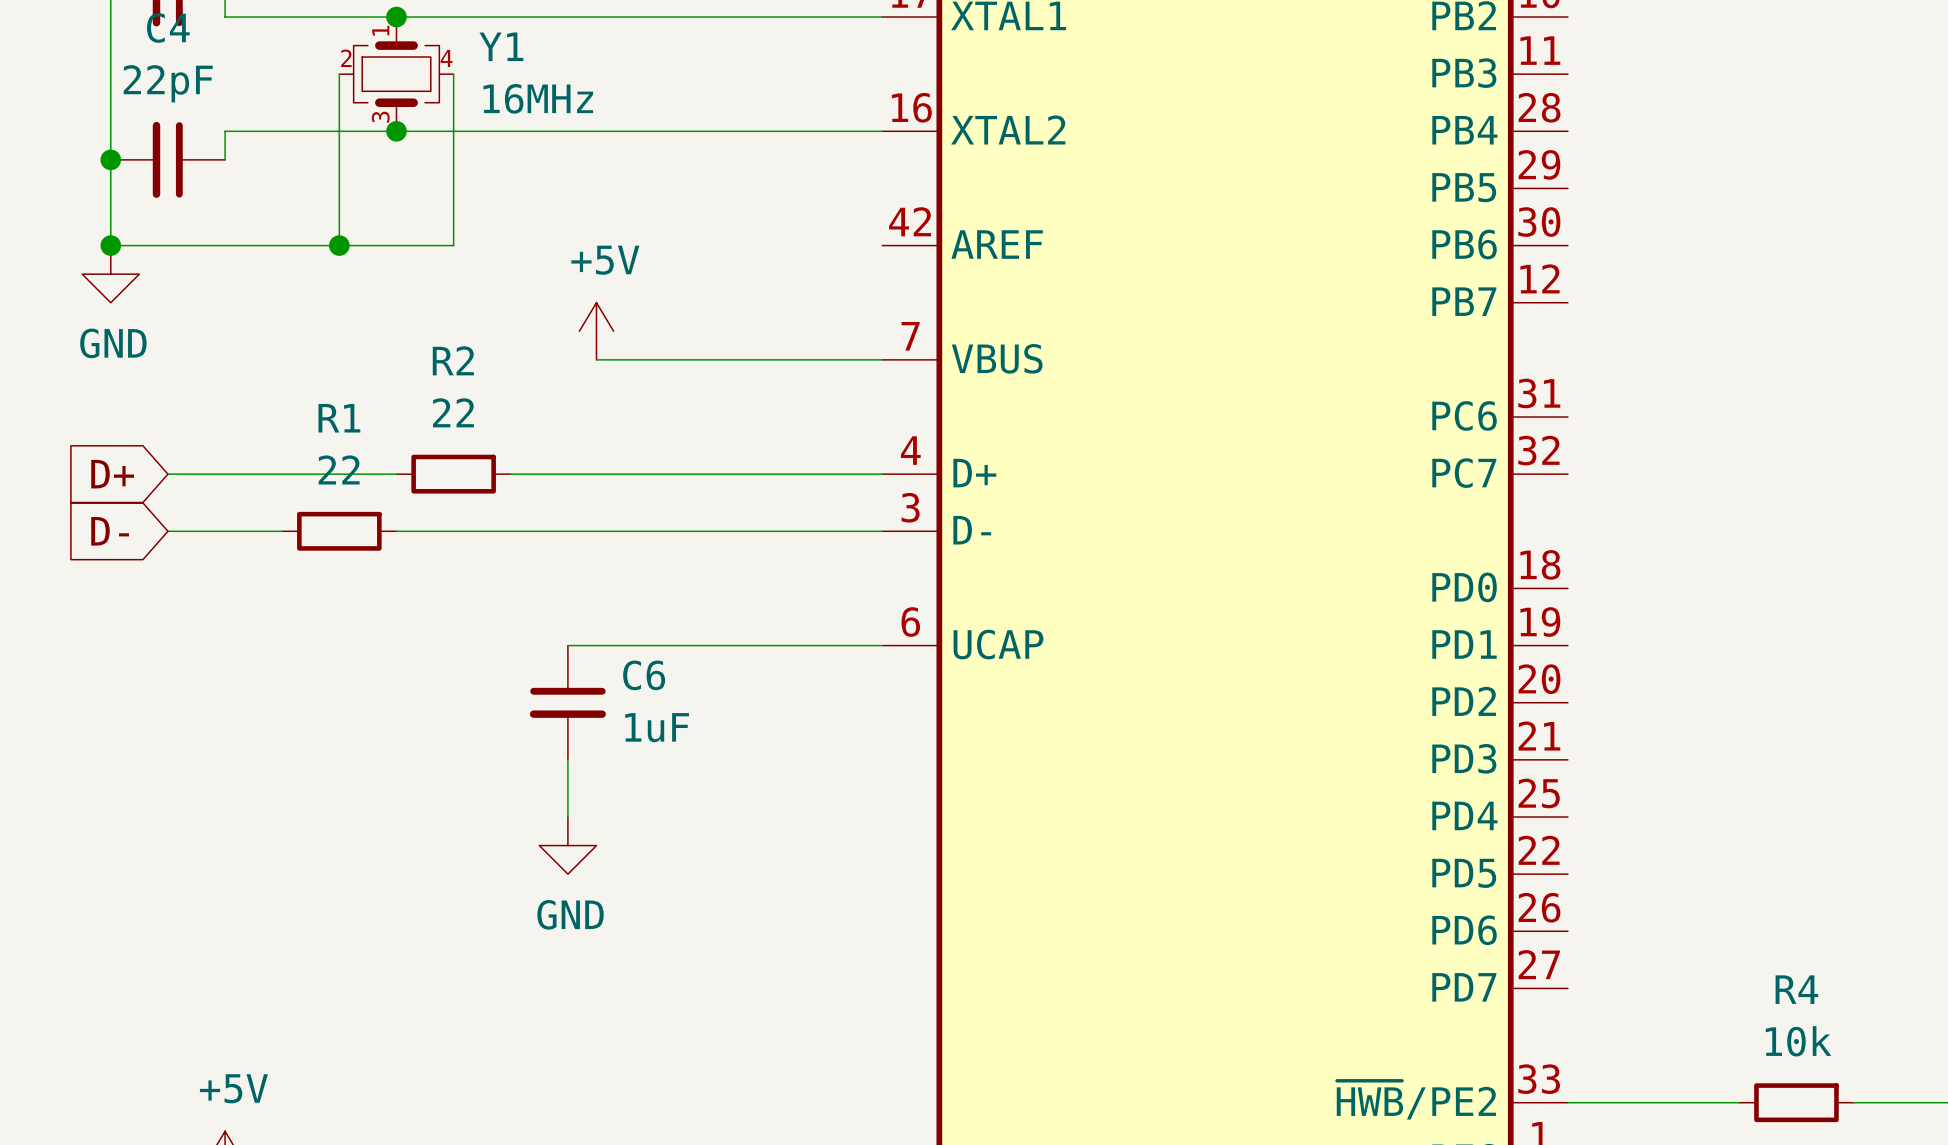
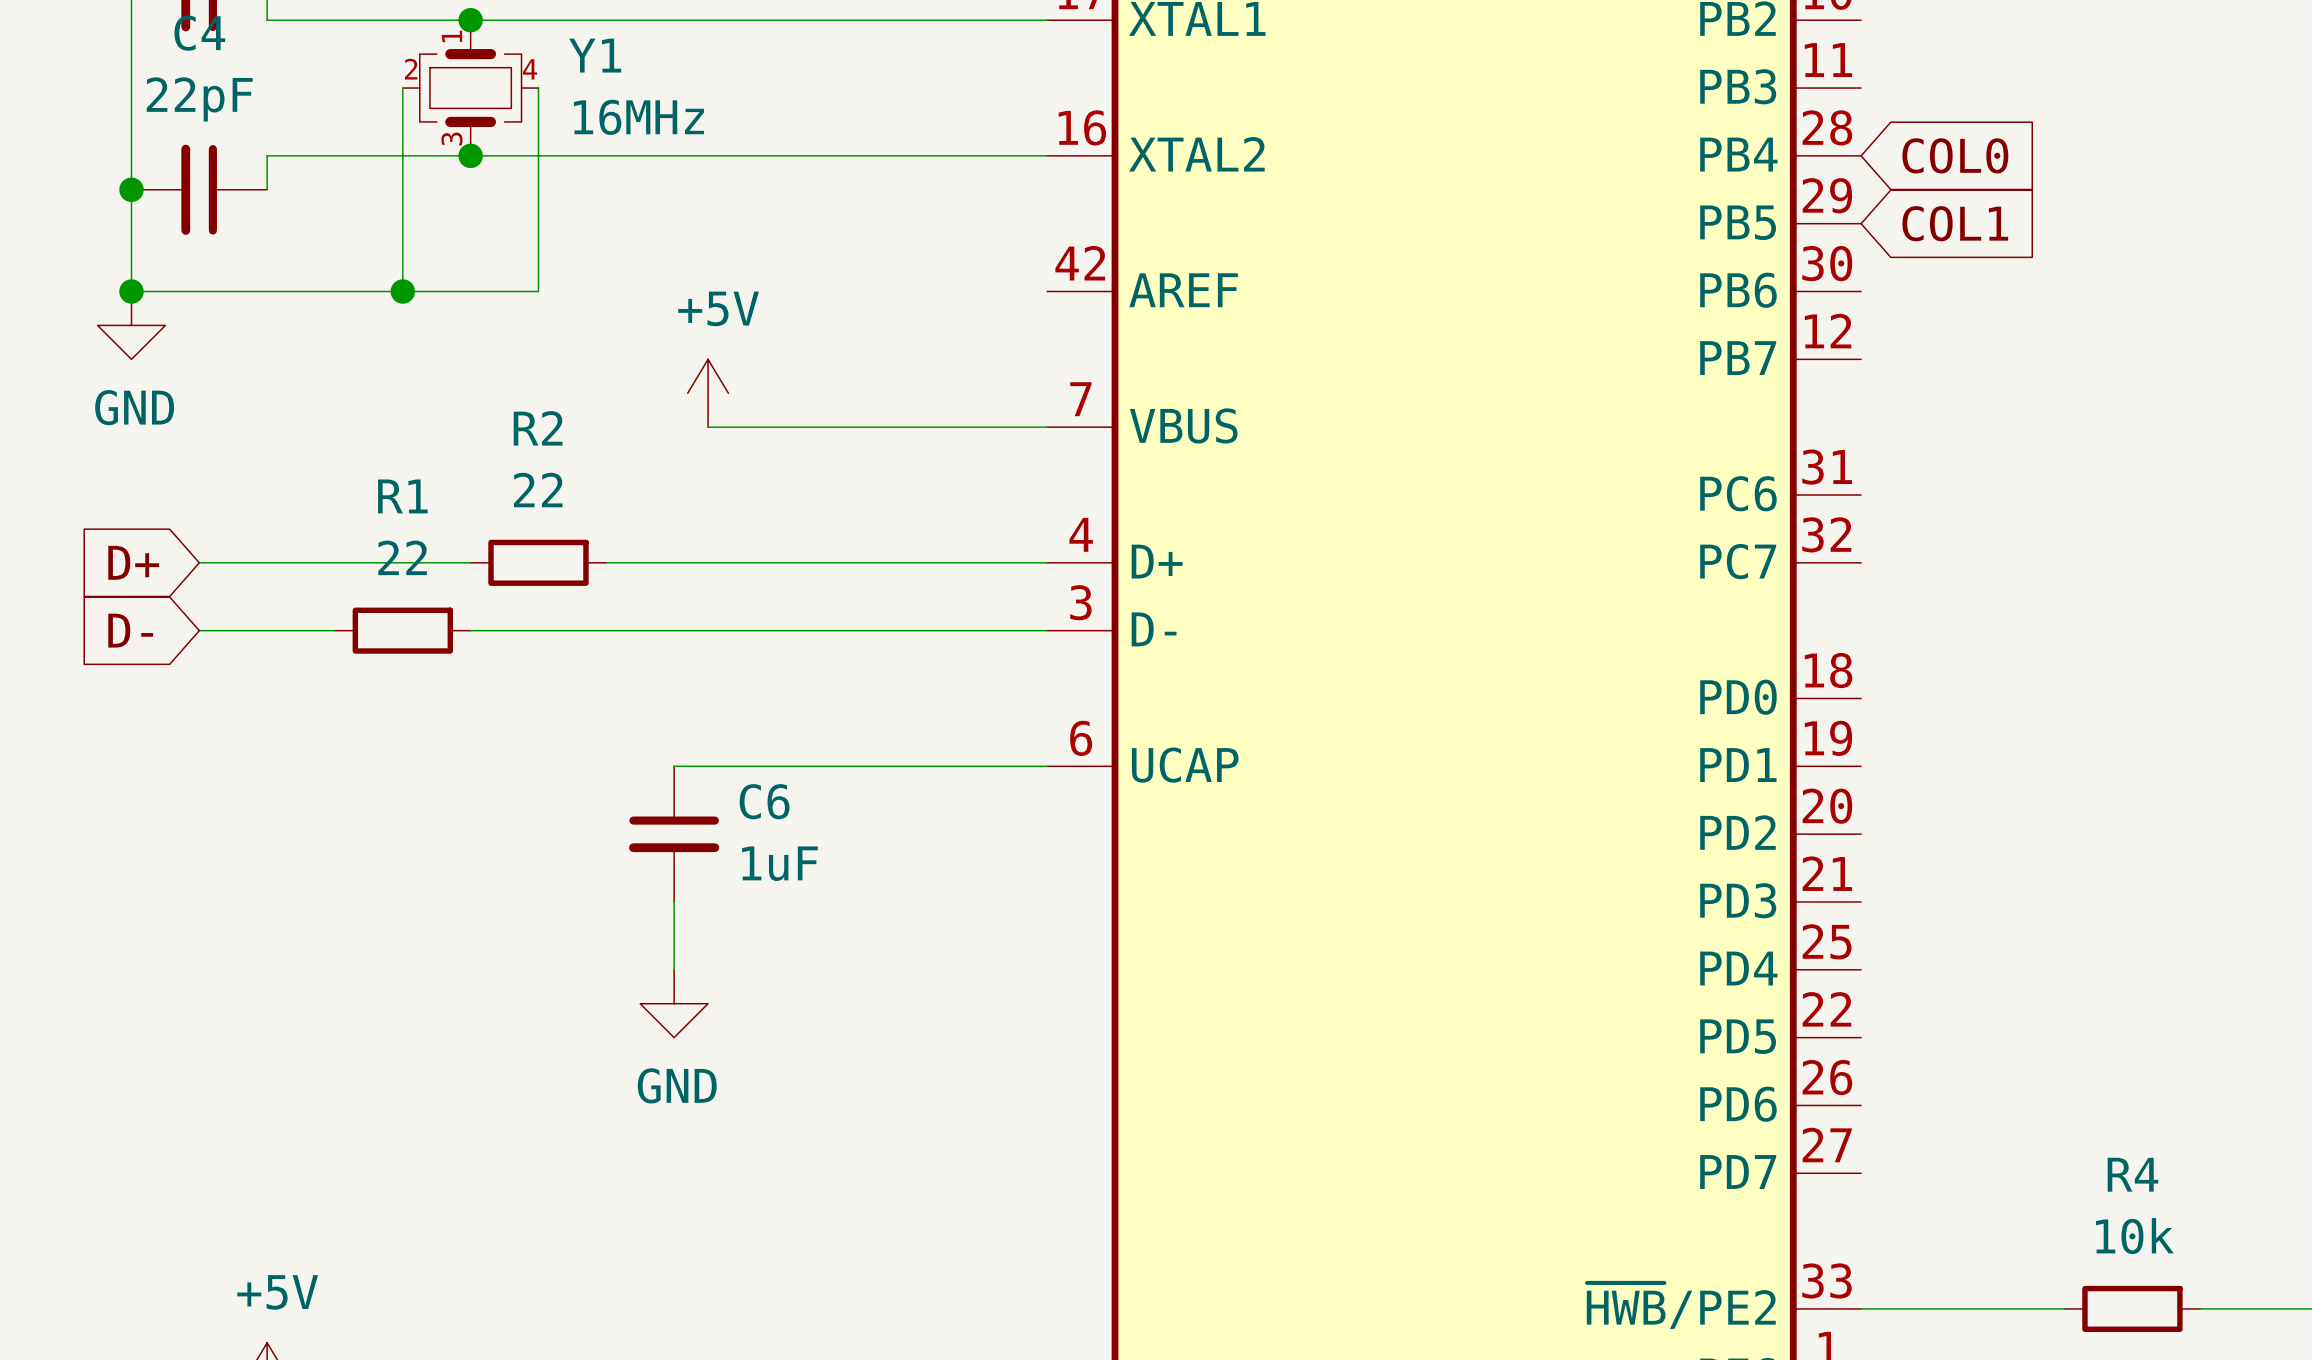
global label: none -> COL0 (1955, 155)
global label: none -> COL1 (1955, 223)

